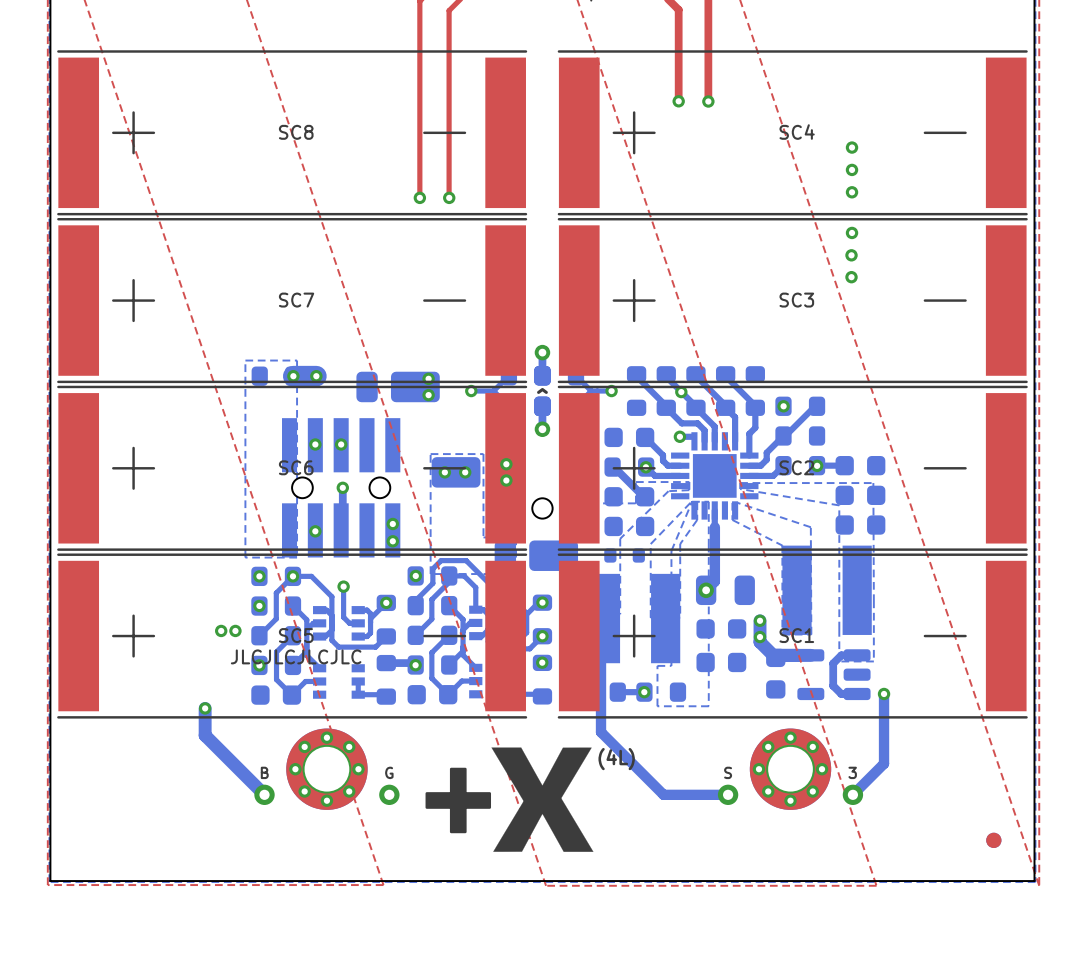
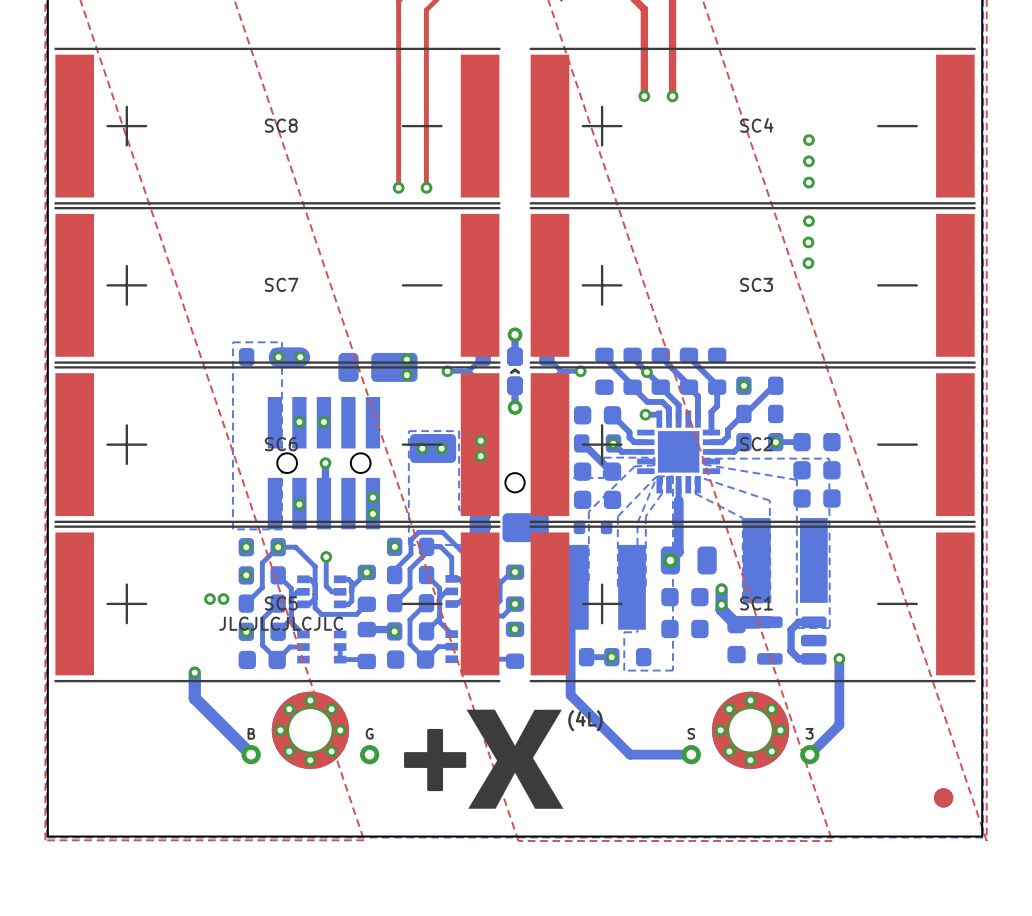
part: (993, 840) -> none
part: none -> (943, 797)

